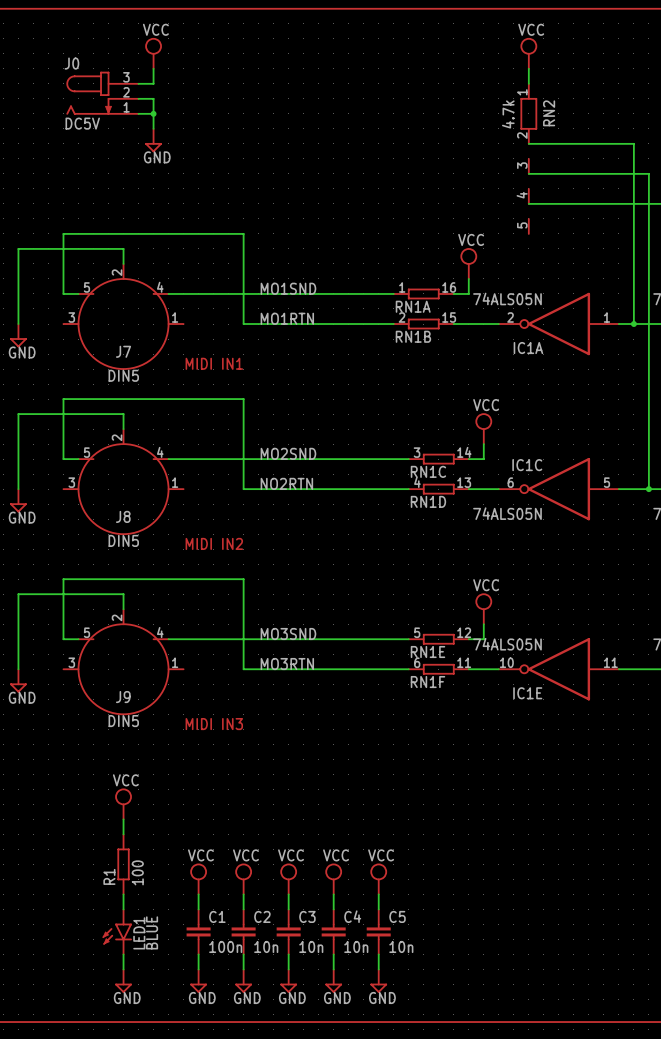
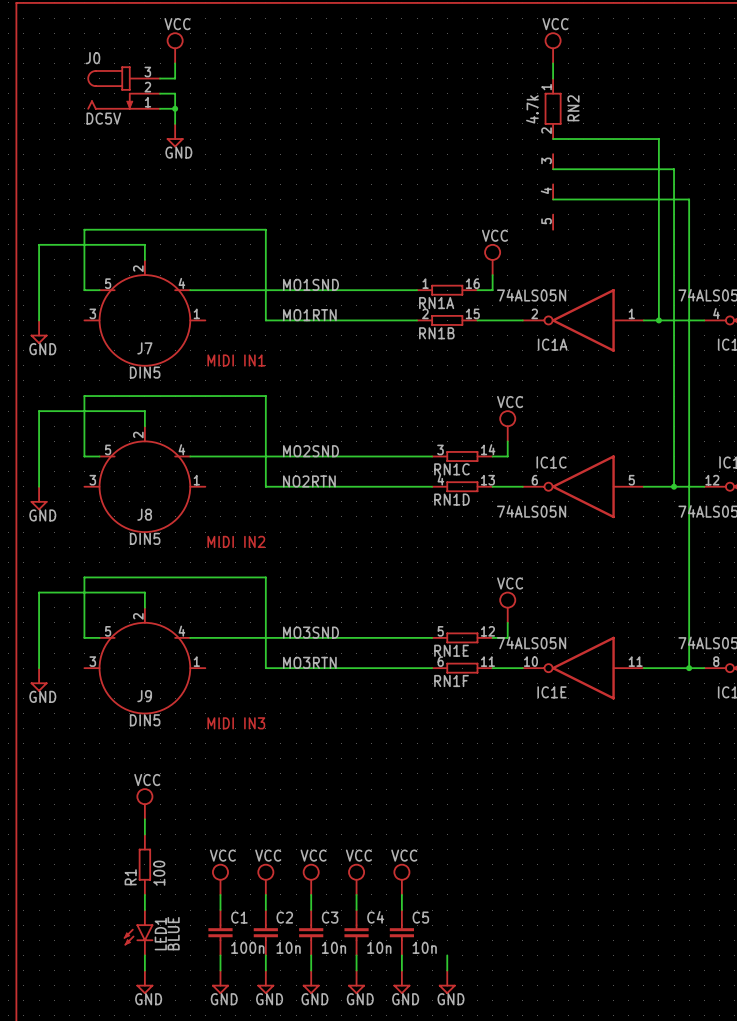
wire: none -> (447, 955) (447, 970)
power symbol: none -> GND (447, 982)

